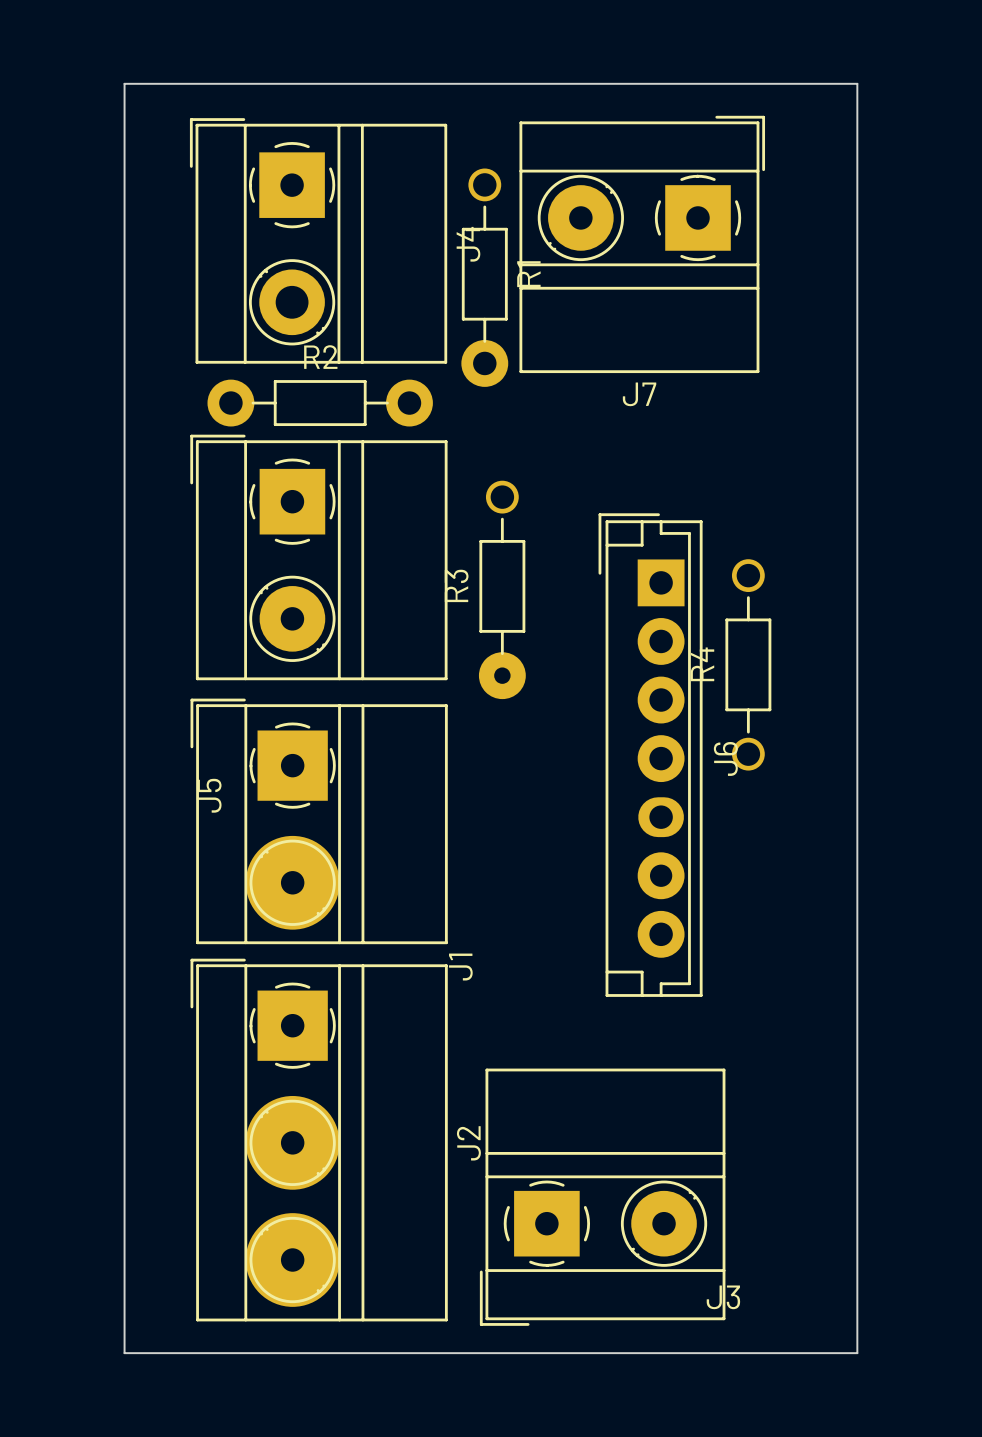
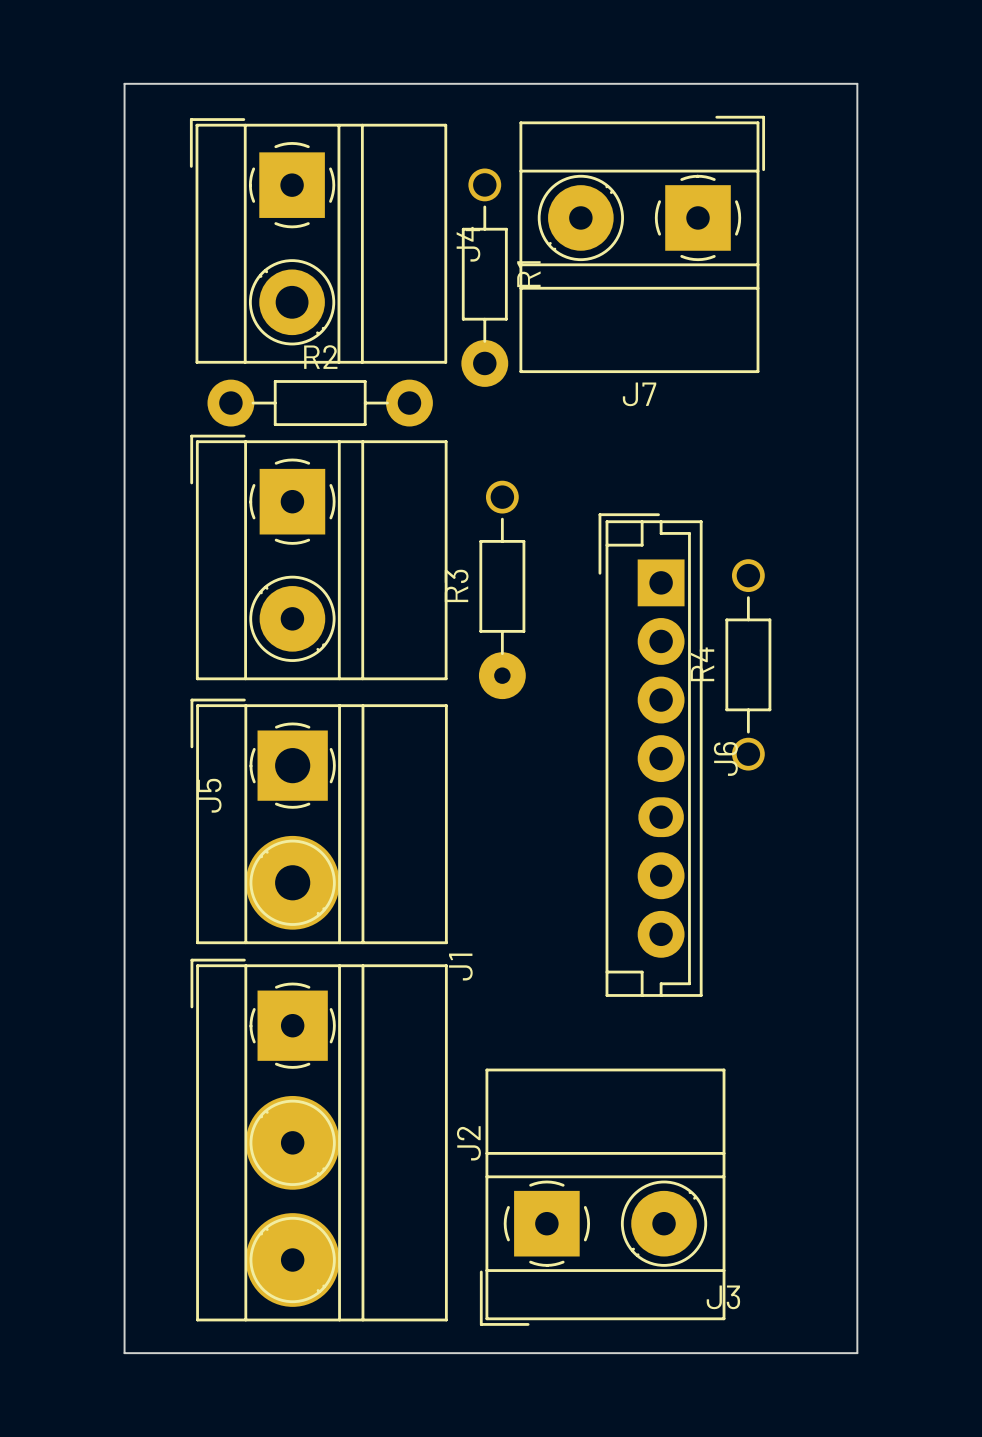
J1 footprint: [190, 698, 448, 945] -> [190, 698, 448, 945]

